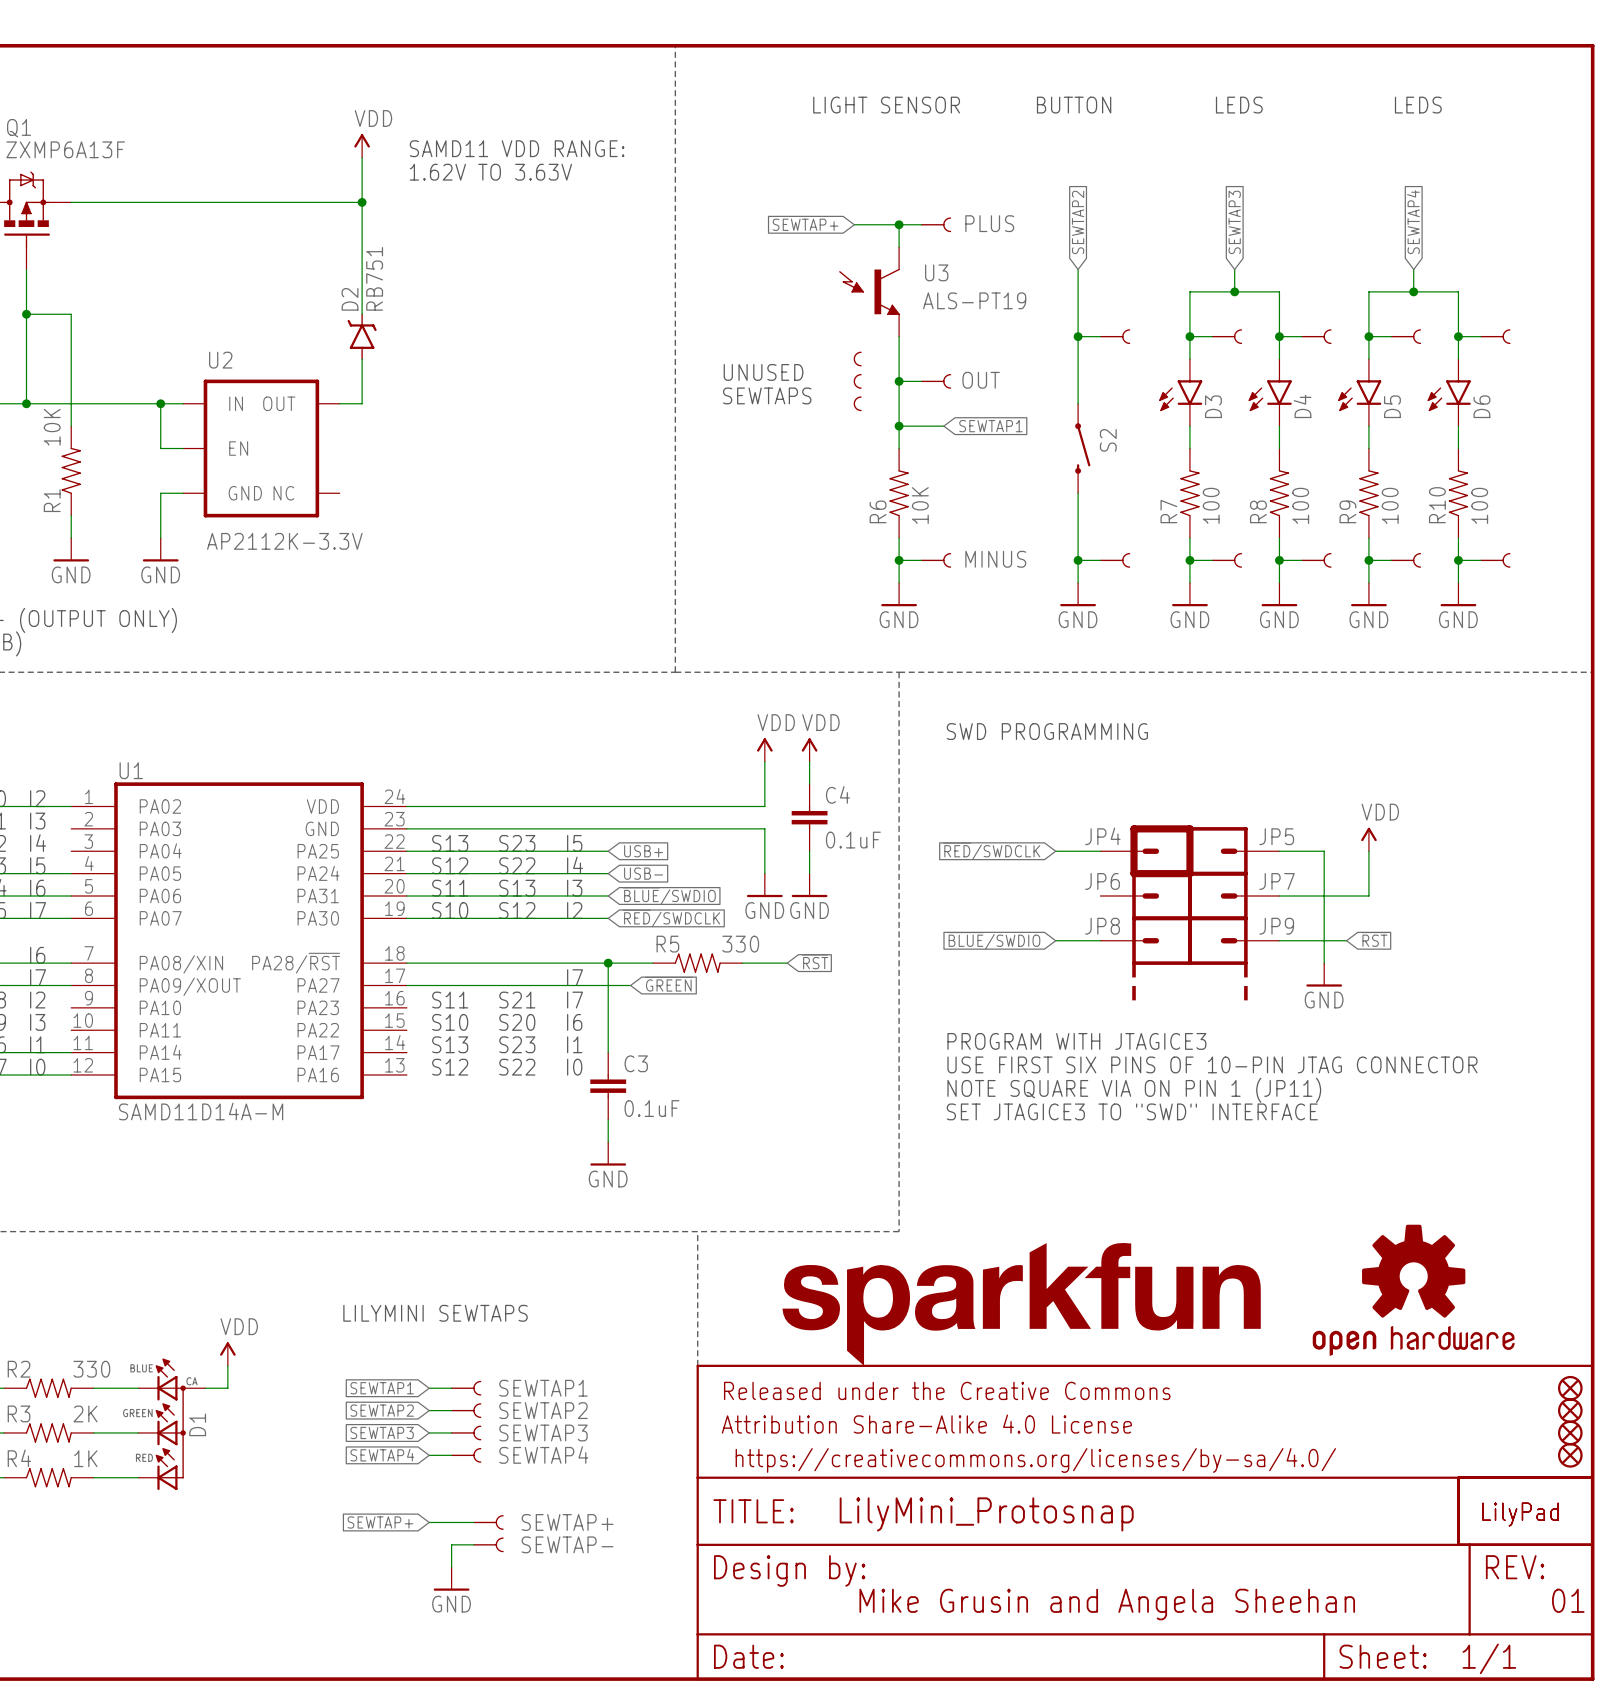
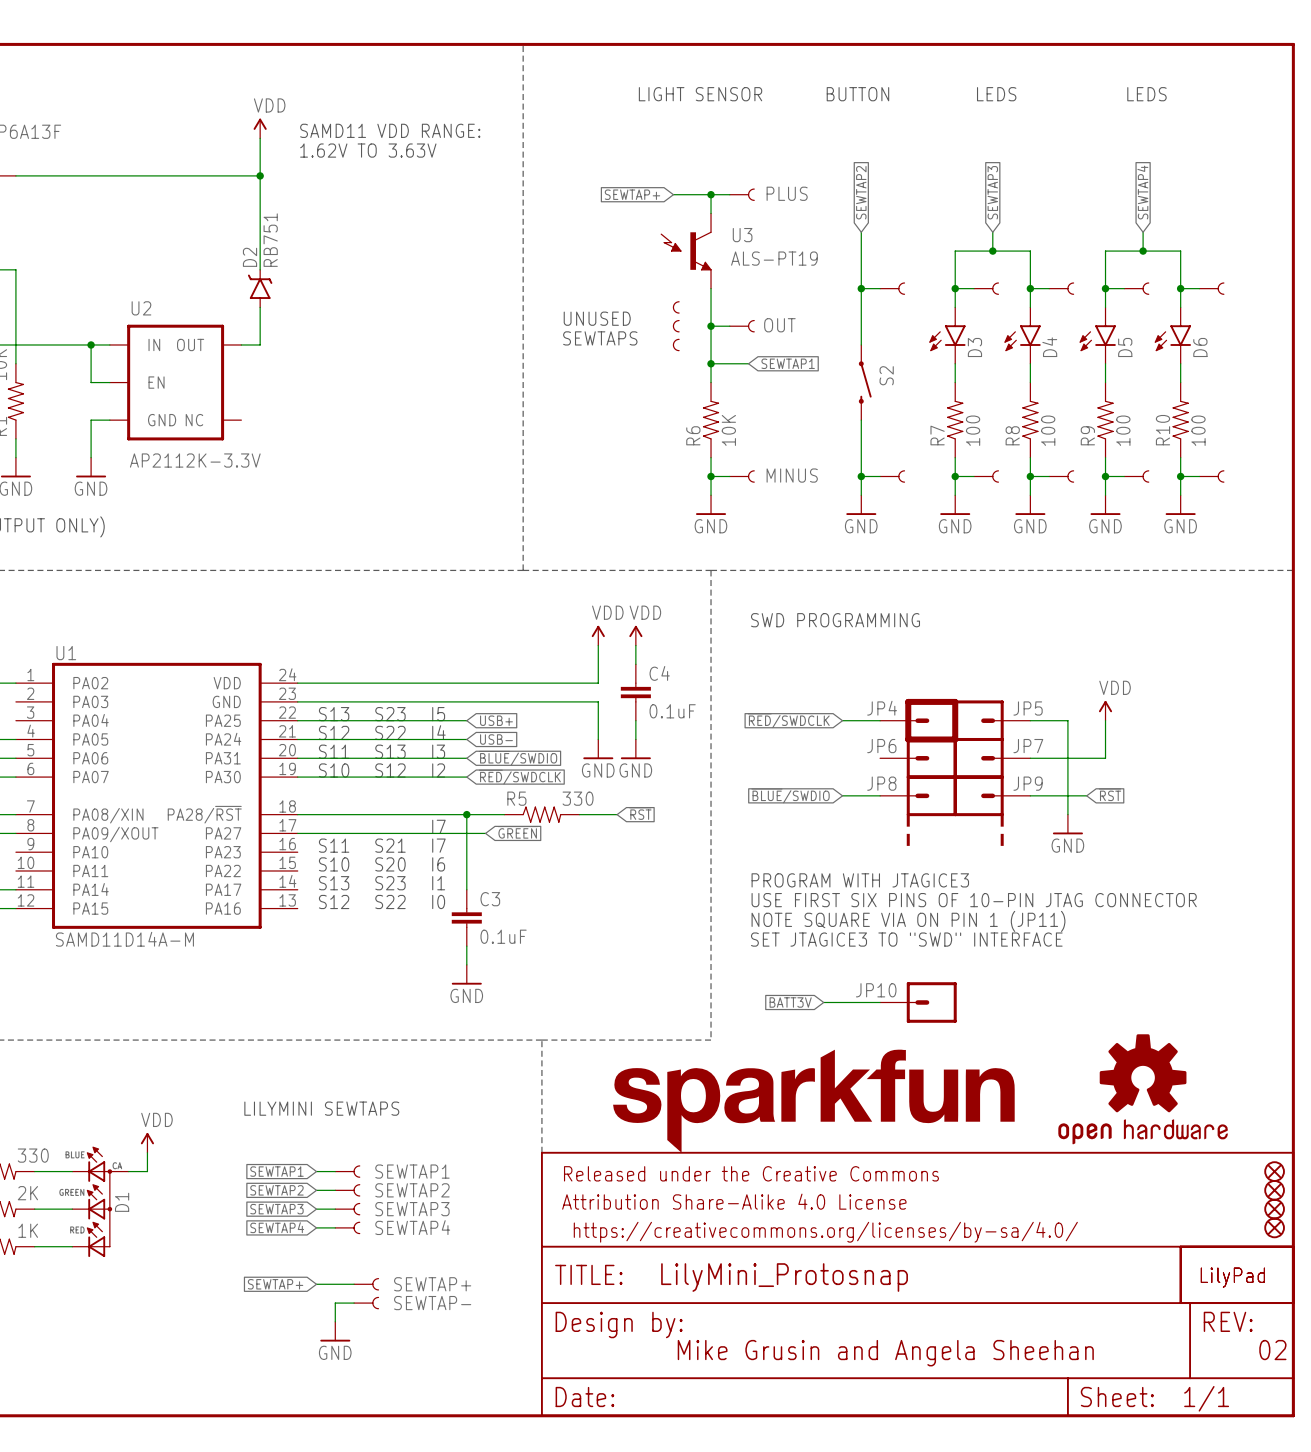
global label: none -> BATT3V (790, 1002)
wire: none -> (823, 1002) (880, 1002)
JP10: none -> (918, 1002)
text: 01 (1568, 1600) -> 02 (1272, 1350)

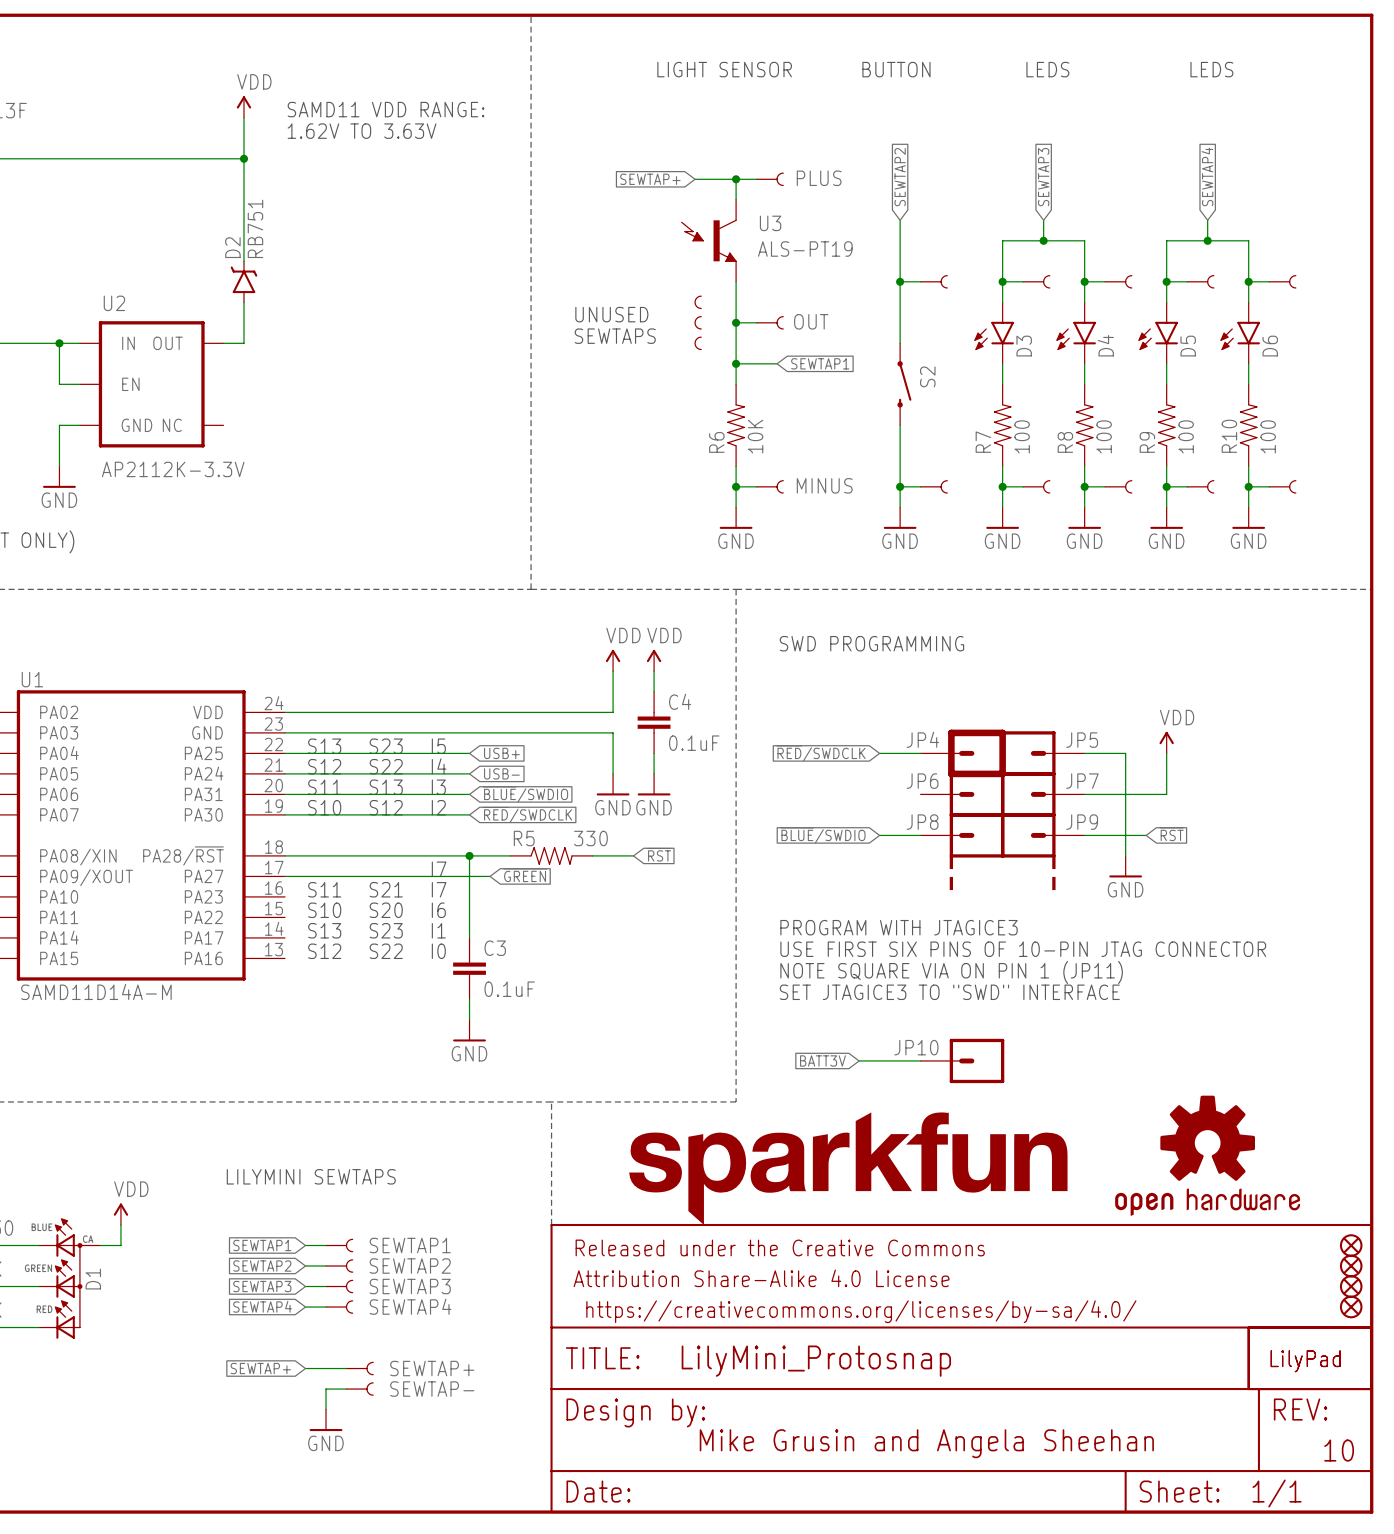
text: 02 (1272, 1350) -> none
text: none -> 10 (1339, 1450)

